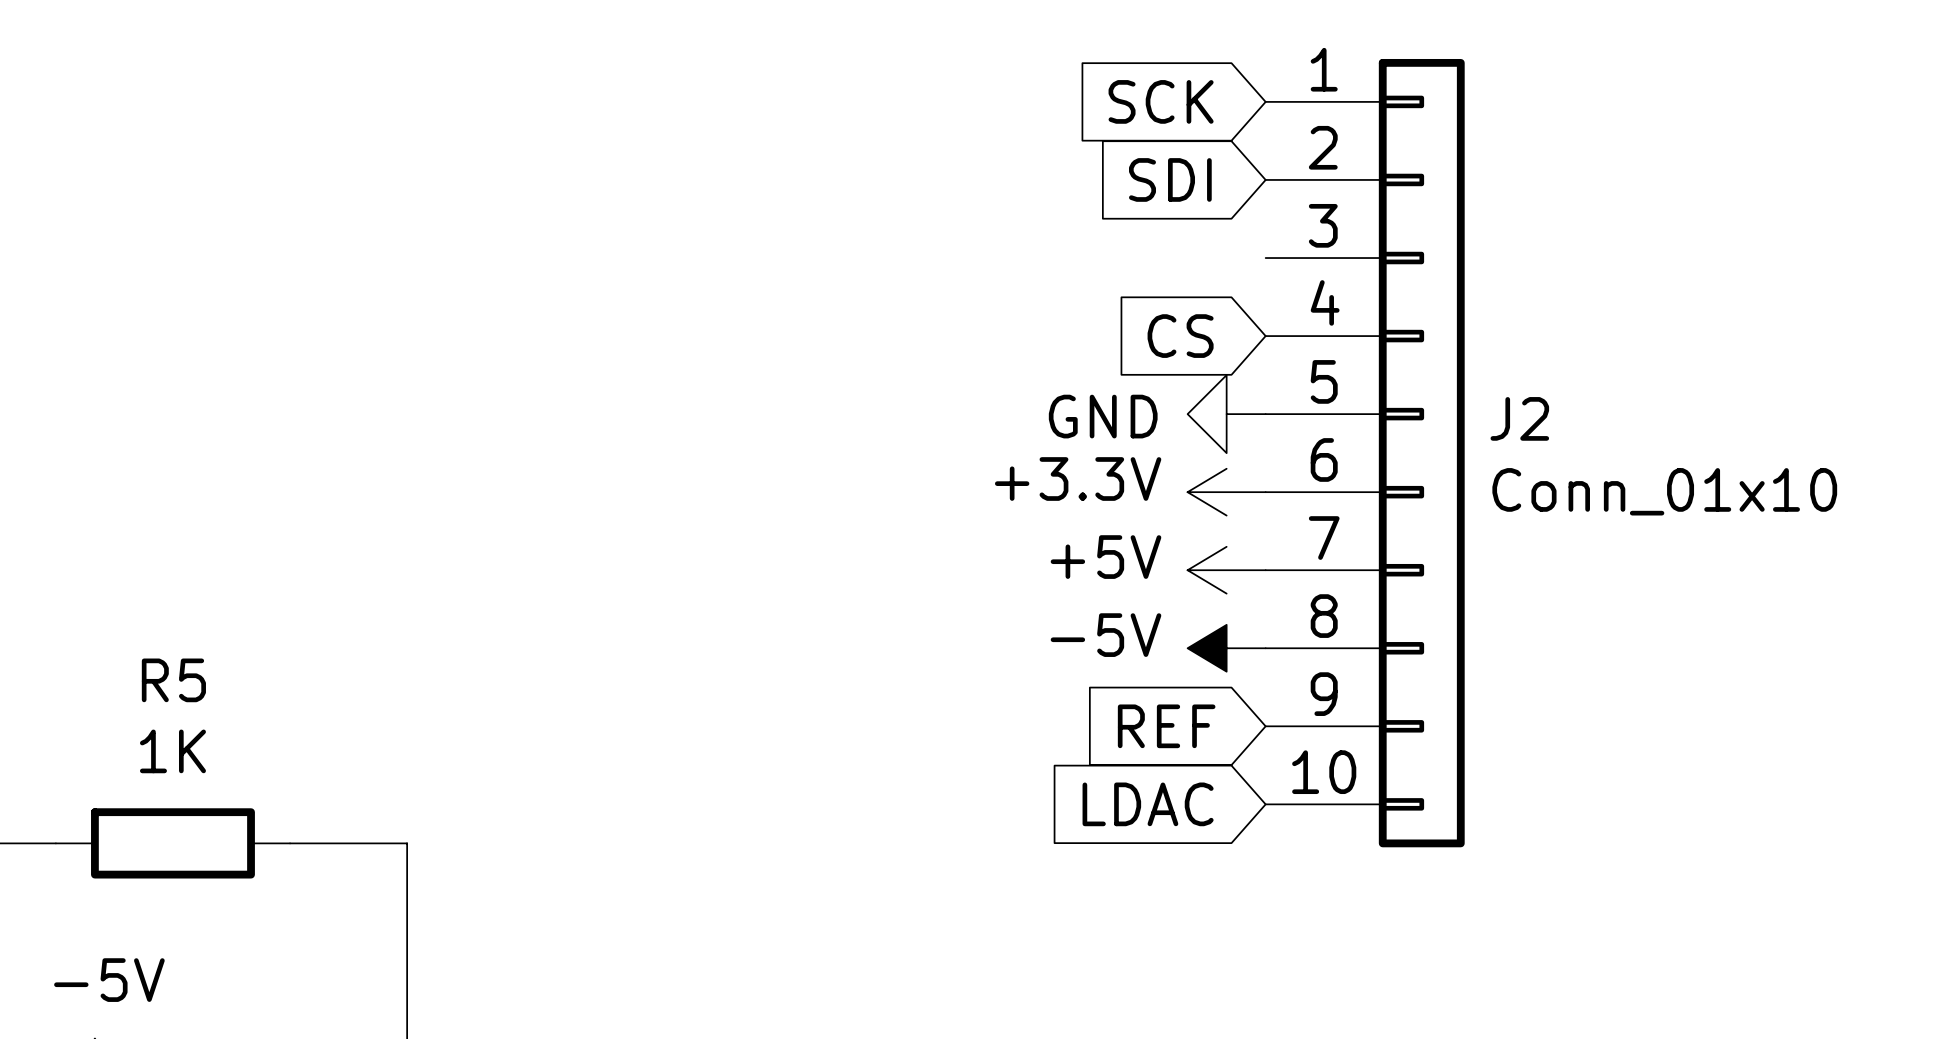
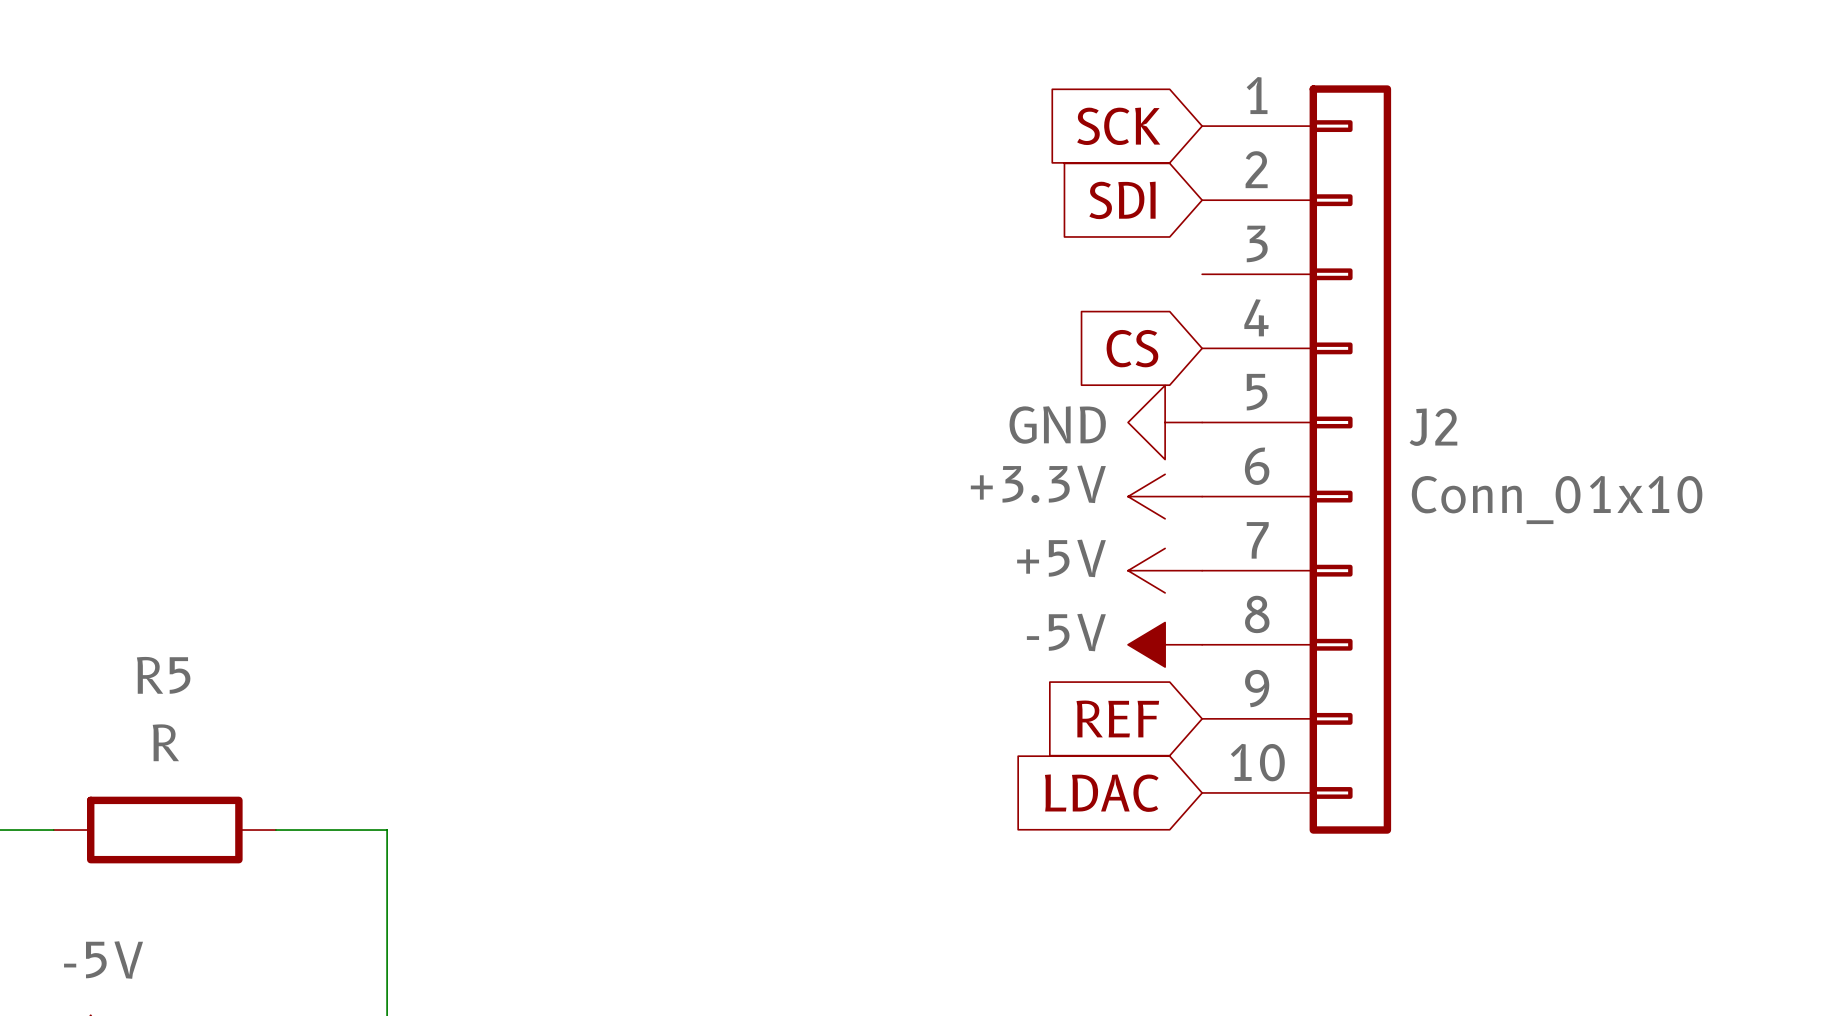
R5 value: 1K (172, 751) -> R (165, 742)

